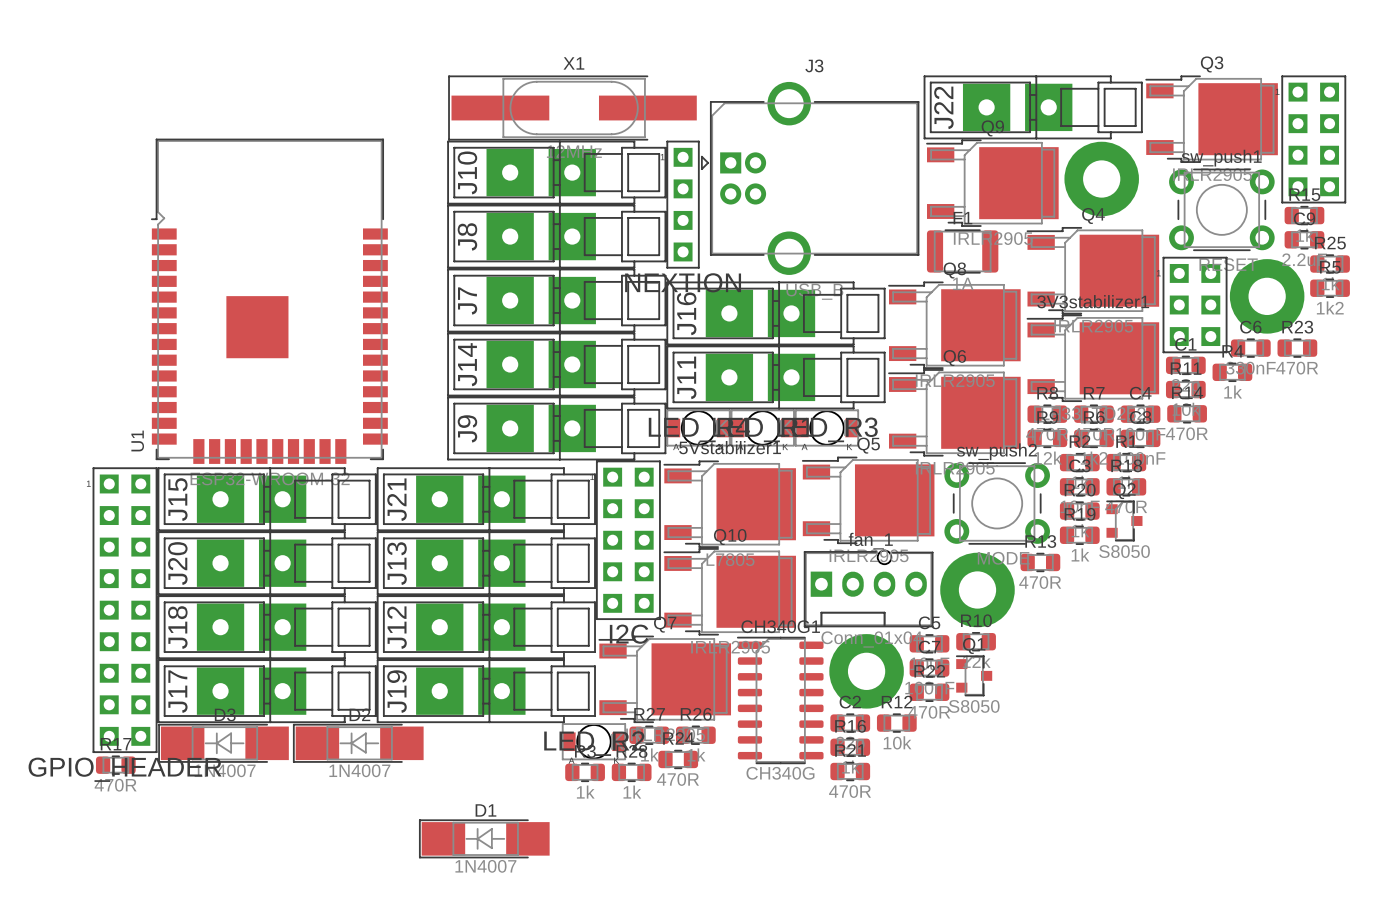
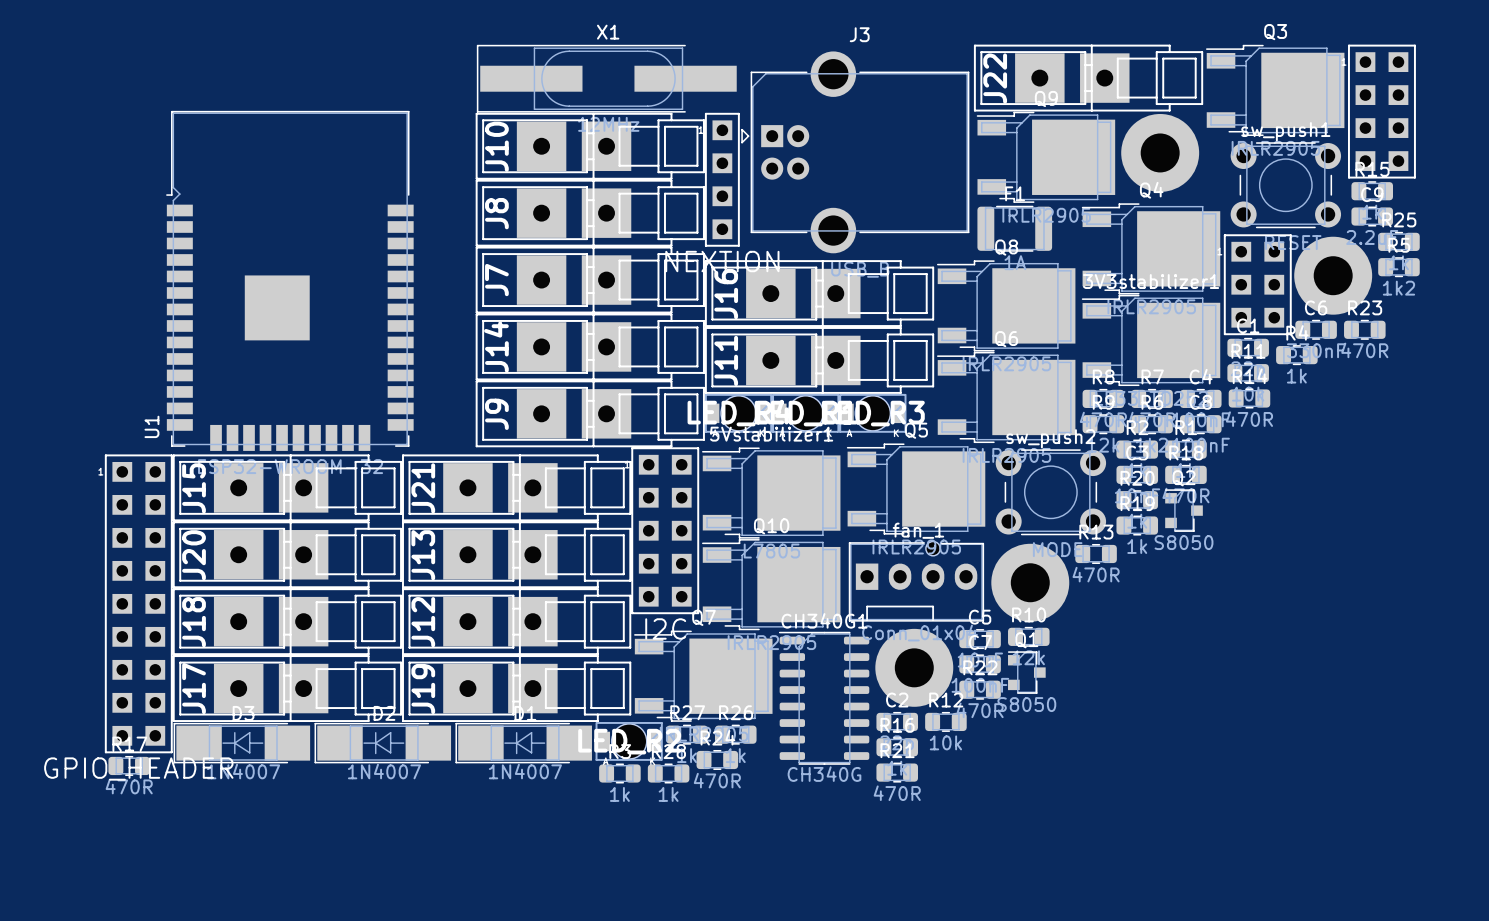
D1 position: (484, 838) -> (523, 743)

